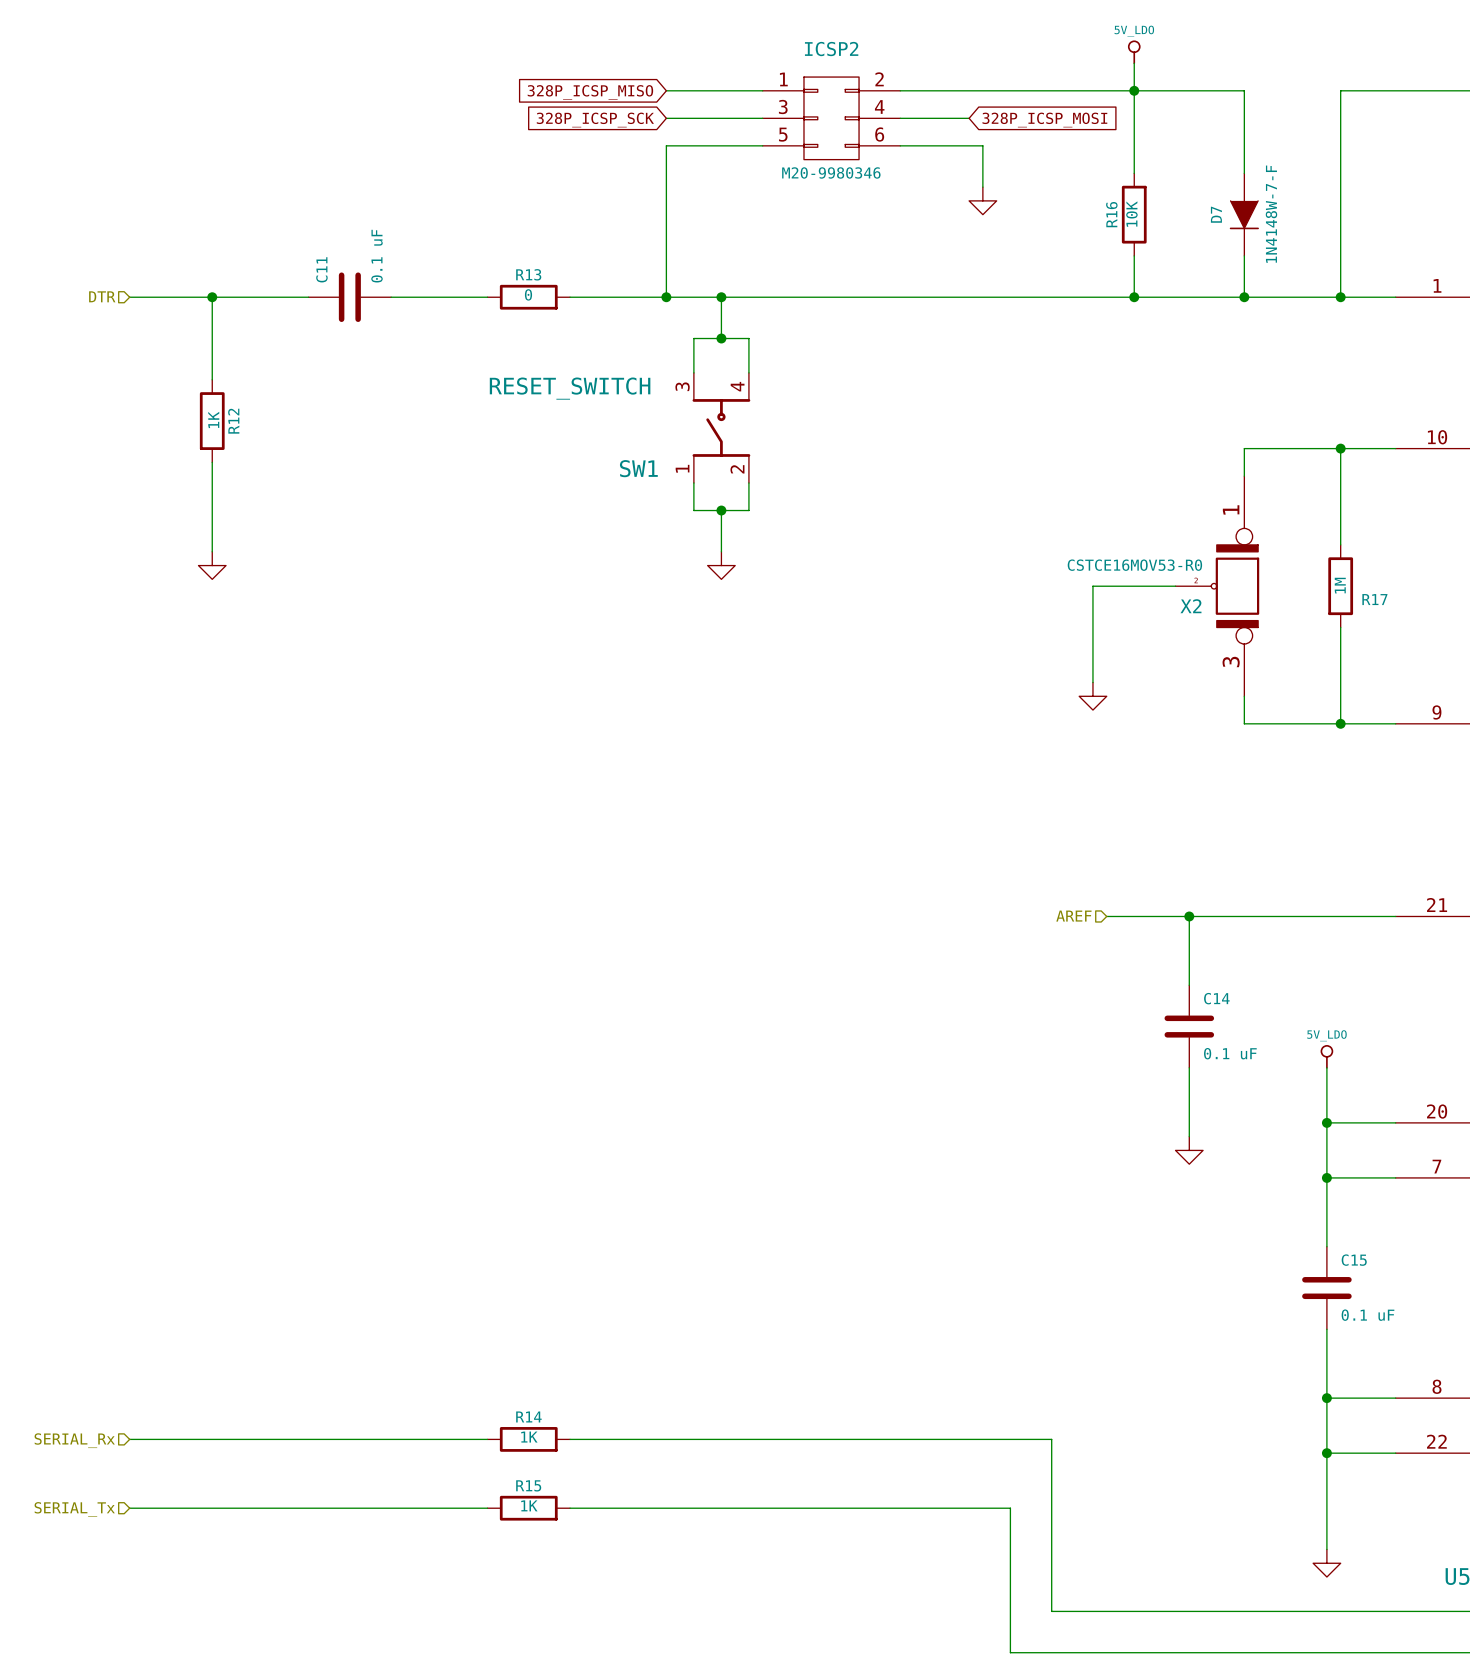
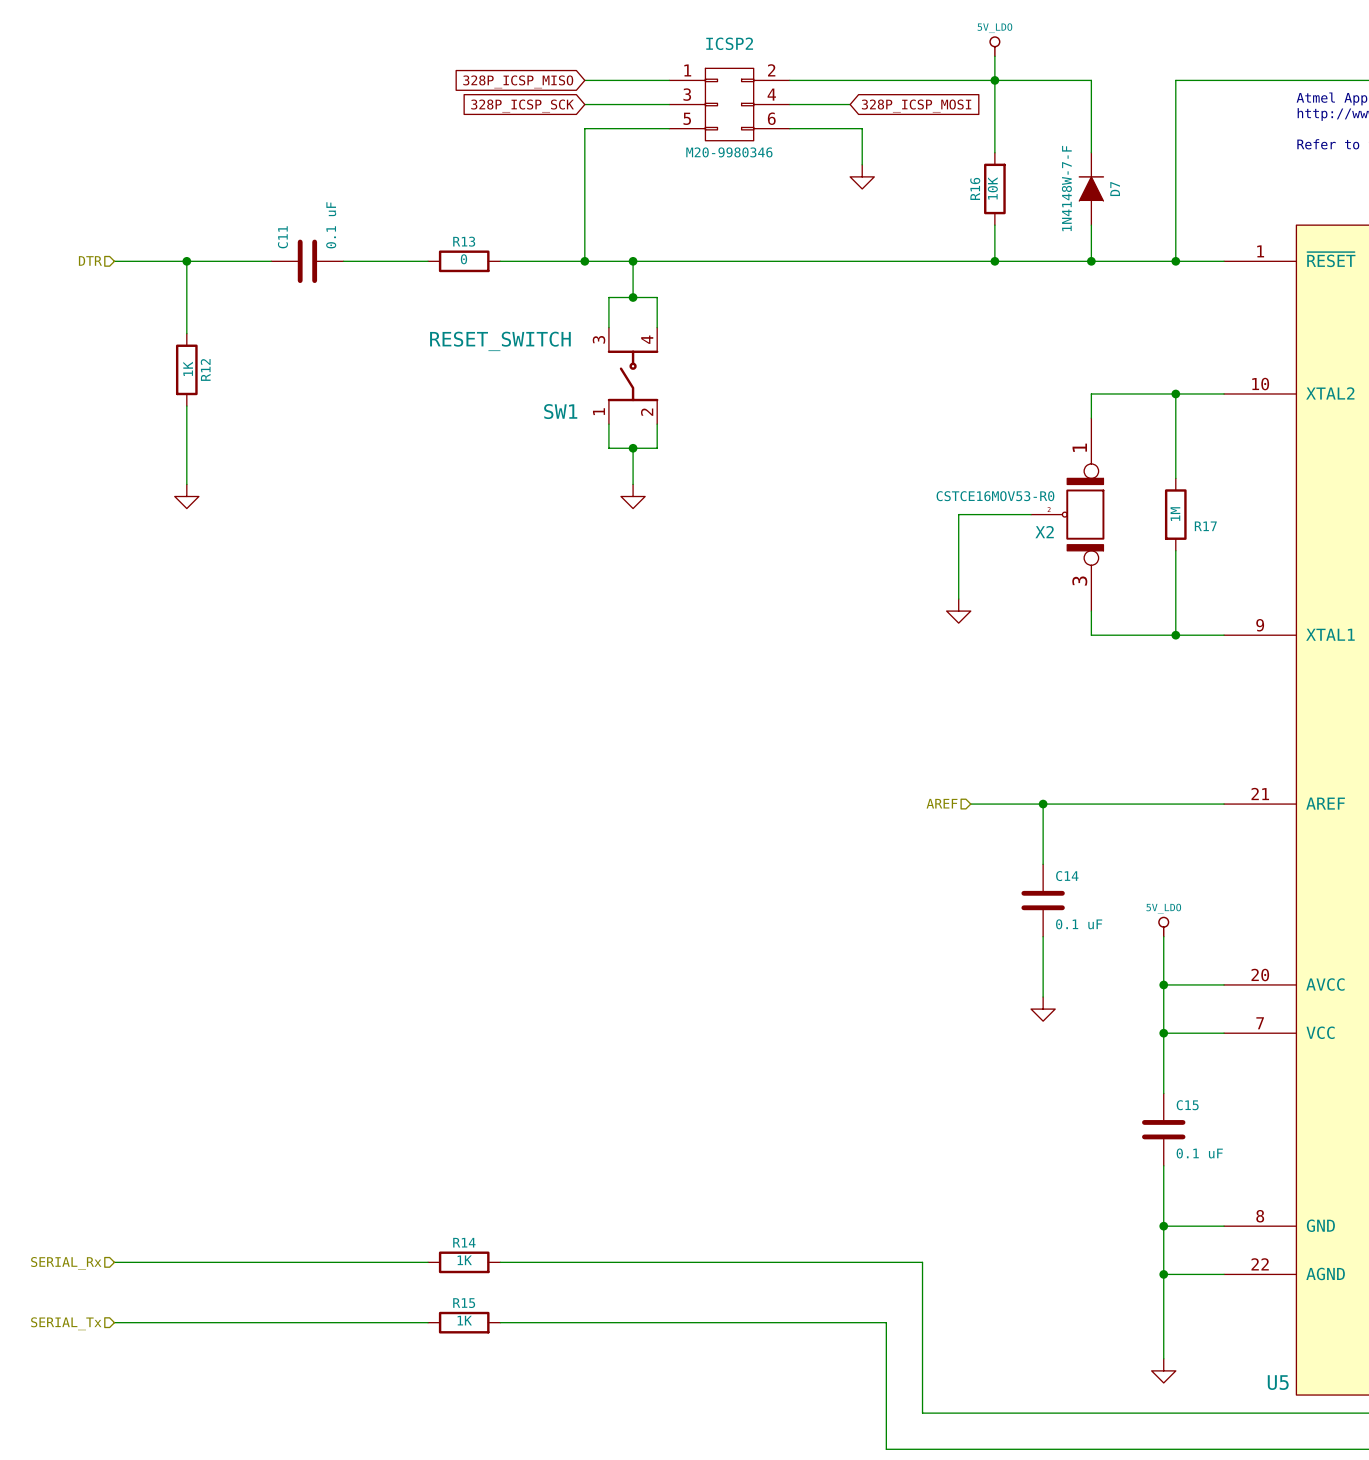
D7 rotation: 0° (1244, 215) -> 180° (1091, 188)

